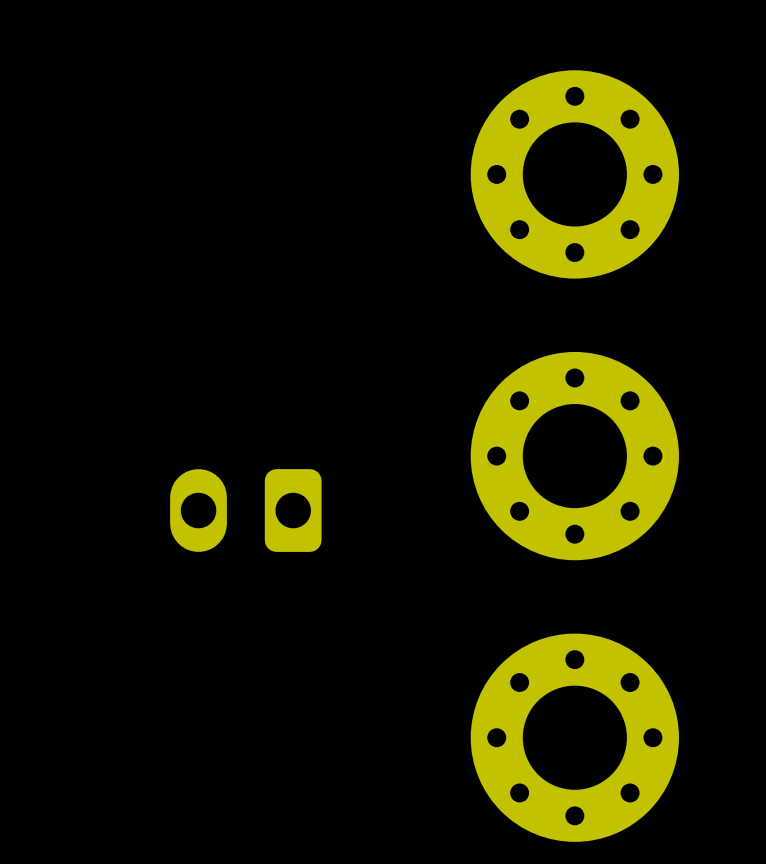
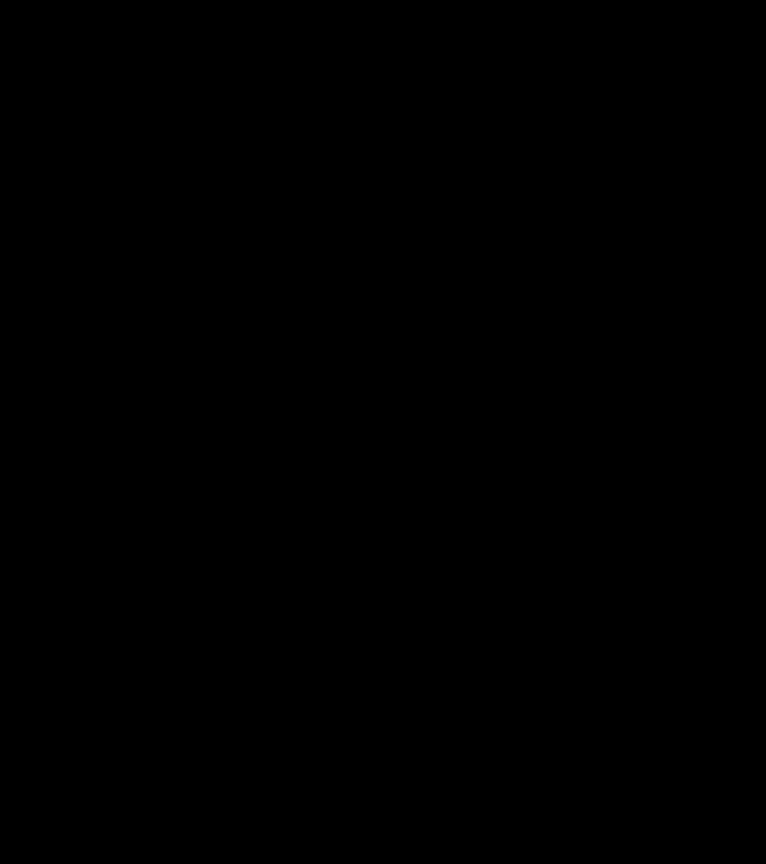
part: (574, 174) -> none
part: (574, 456) -> none
part: (245, 510) -> none
part: (574, 737) -> none

